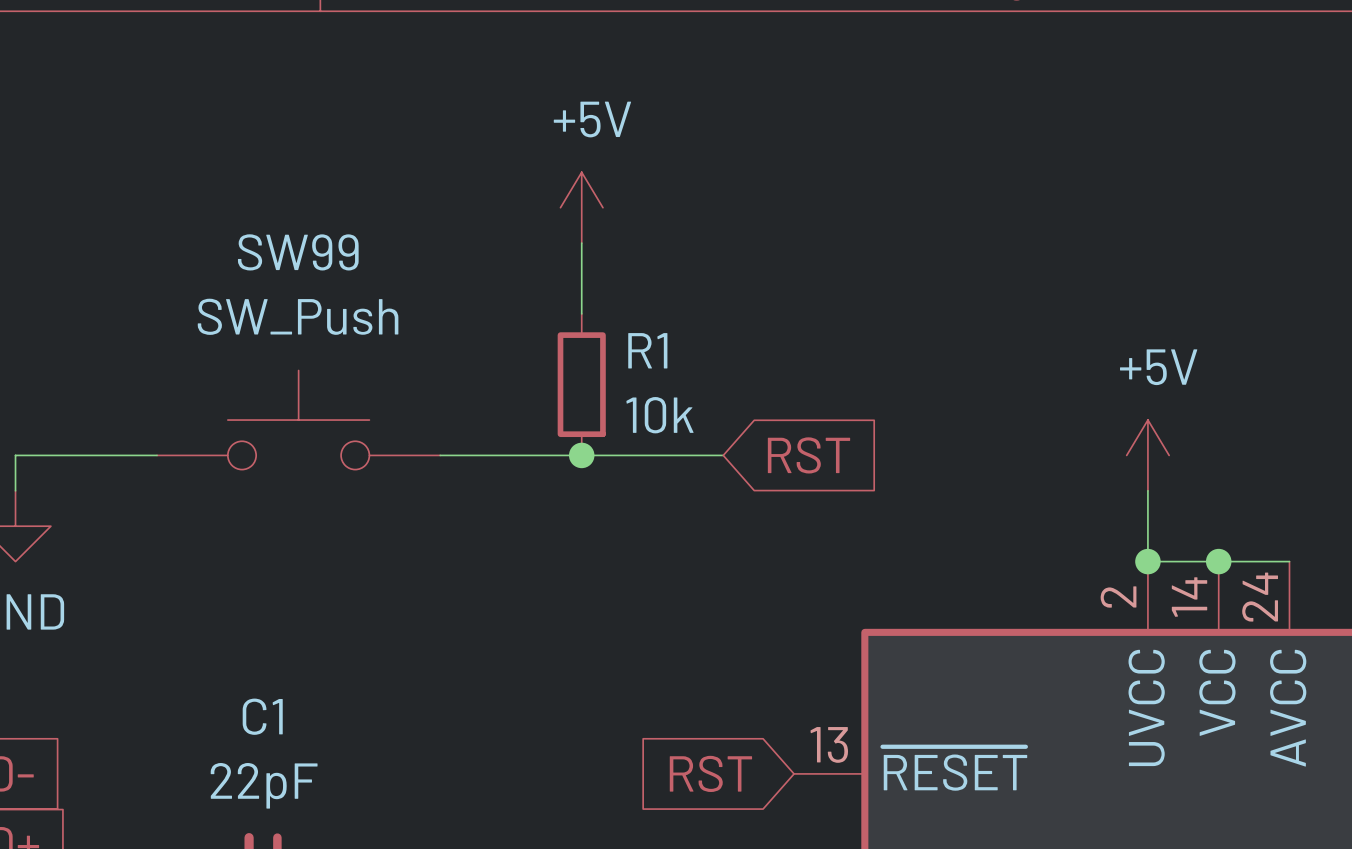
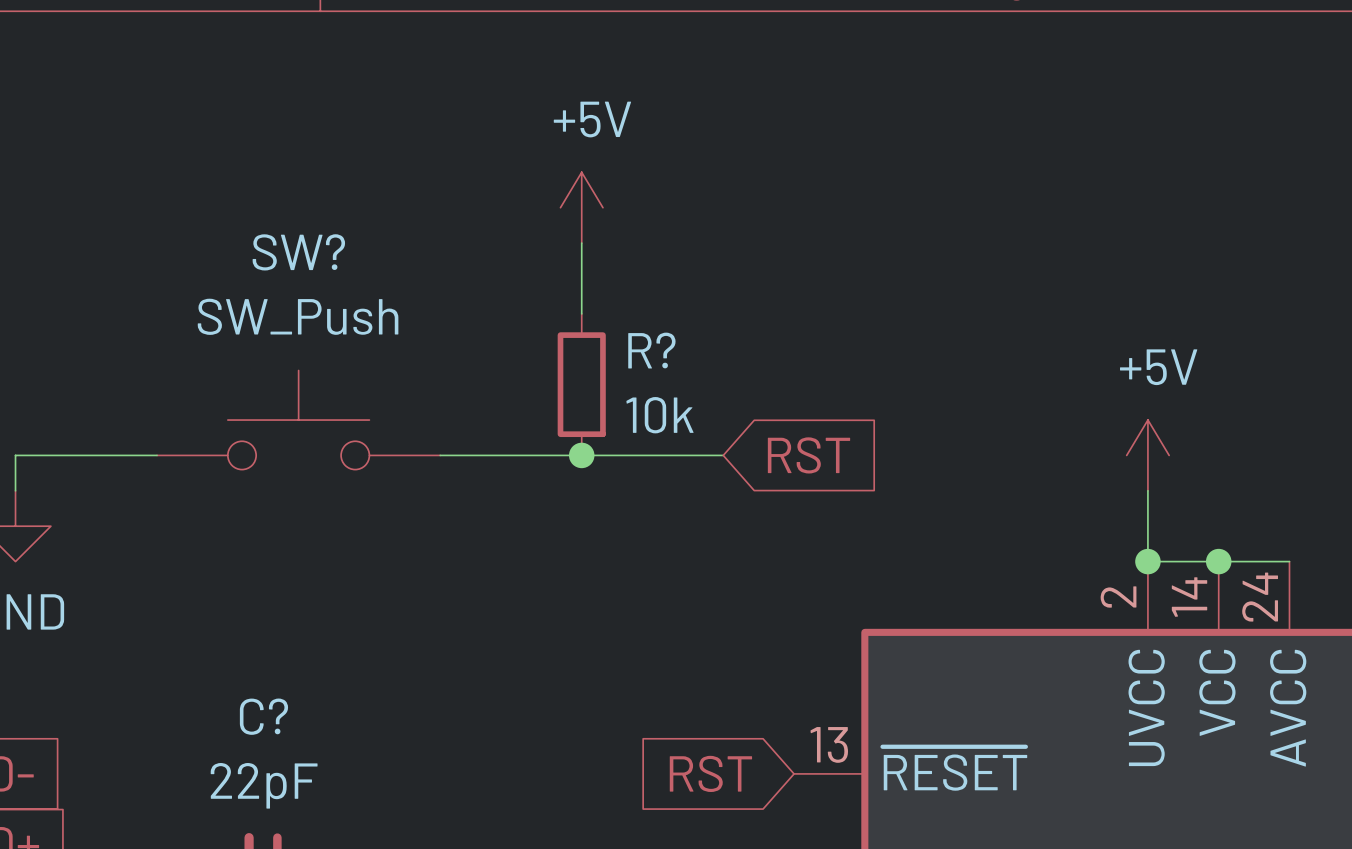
SW99 name: SW99 (298, 252) -> SW? (298, 252)
R1 name: R1 (647, 350) -> R? (651, 350)
C1 name: C1 (262, 716) -> C? (263, 716)

